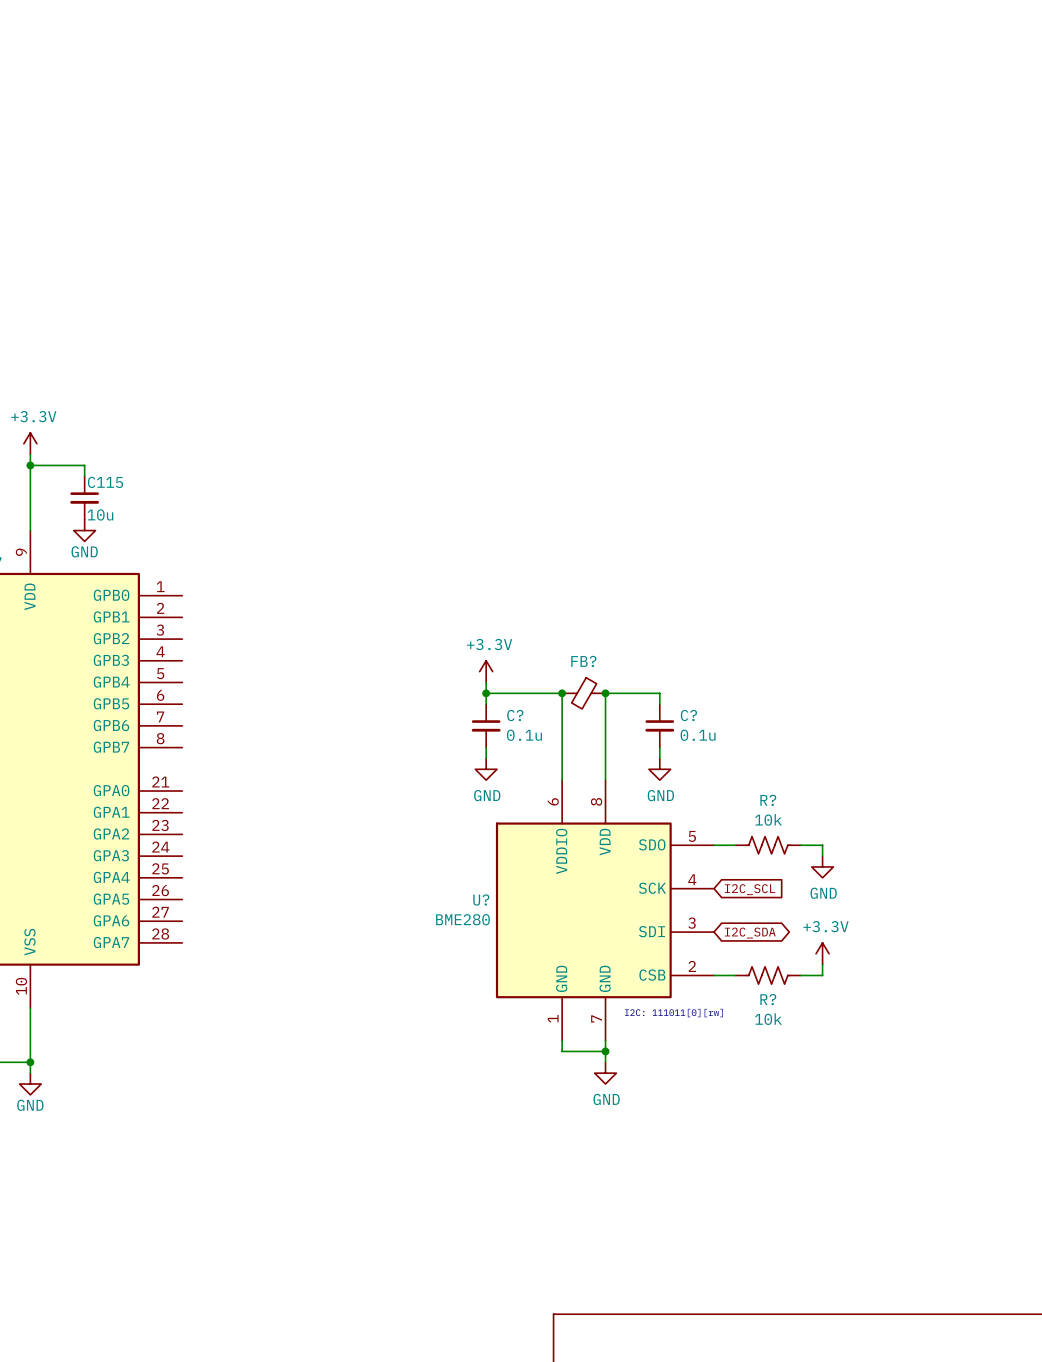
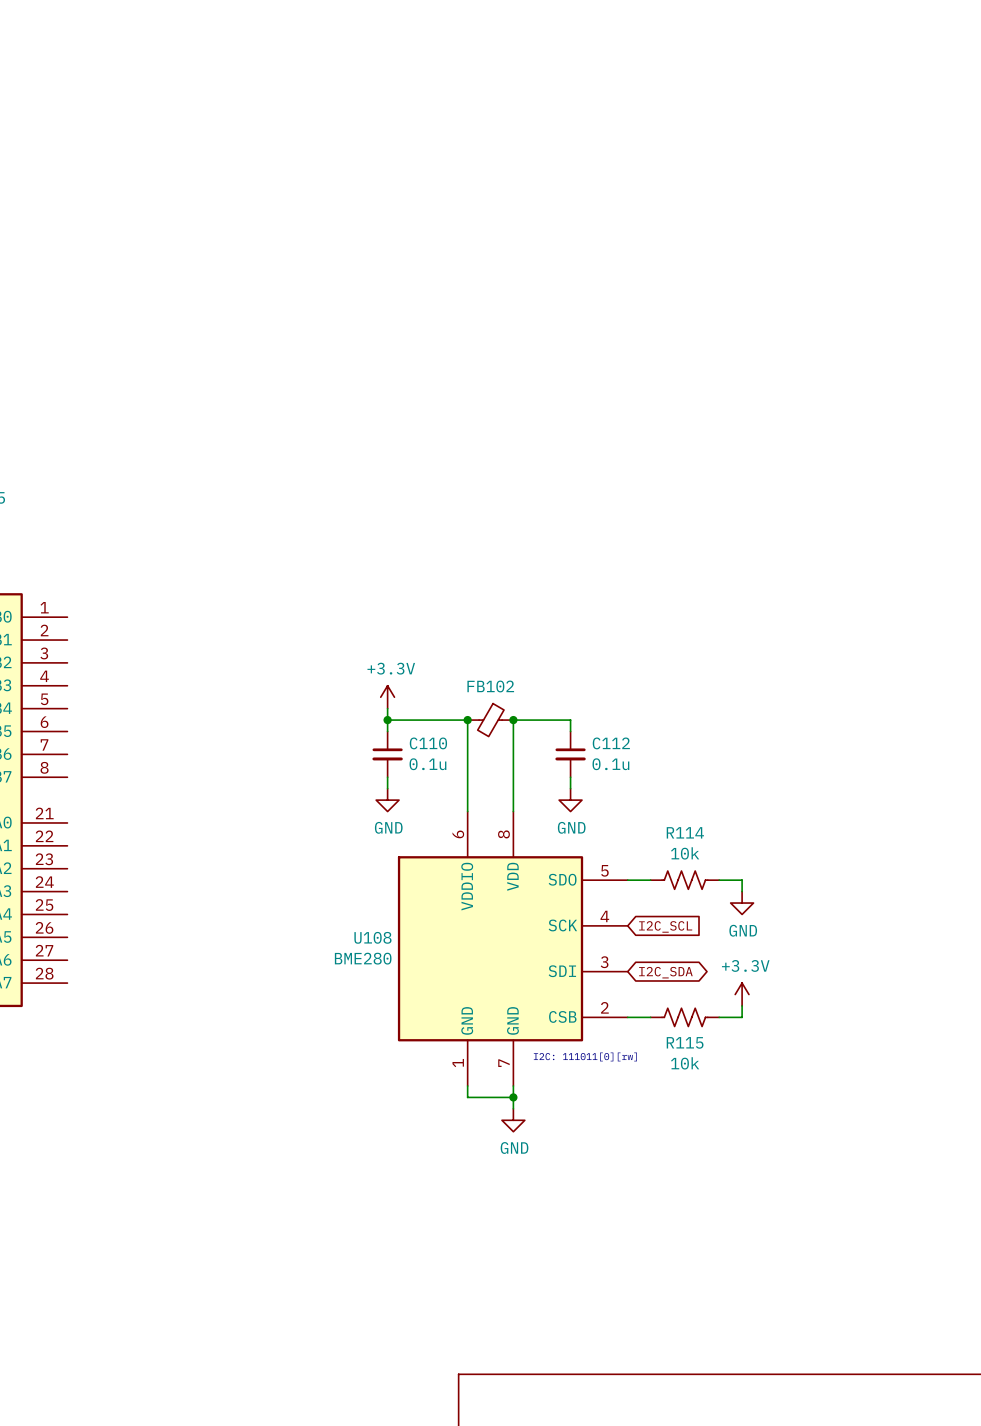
FB? name: FB? (583, 661) -> FB102 (490, 686)
C? name: C? (515, 715) -> C110 (428, 743)
C? name: C? (688, 715) -> C112 (611, 743)
R? name: R? (768, 800) -> R114 (685, 832)
U? name: U? (481, 899) -> U108 (372, 937)
R? name: R? (768, 999) -> R115 (685, 1042)

